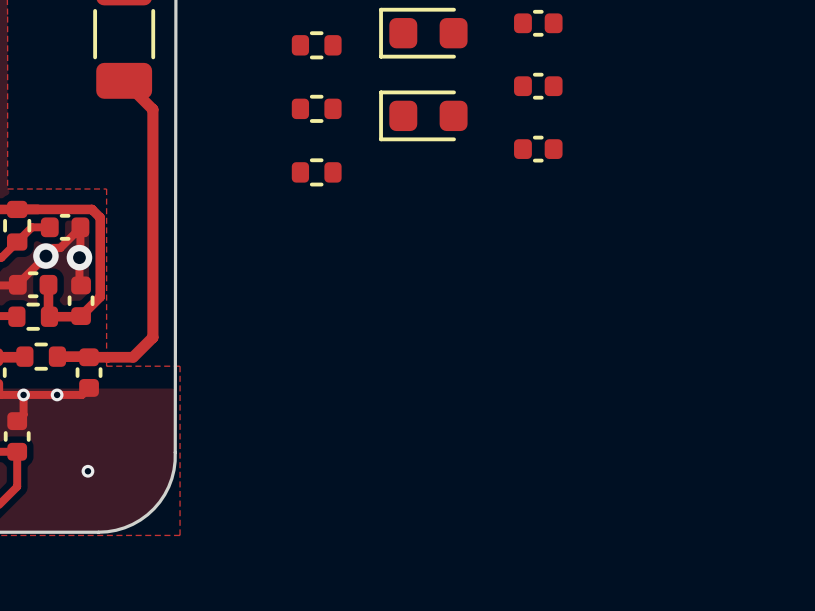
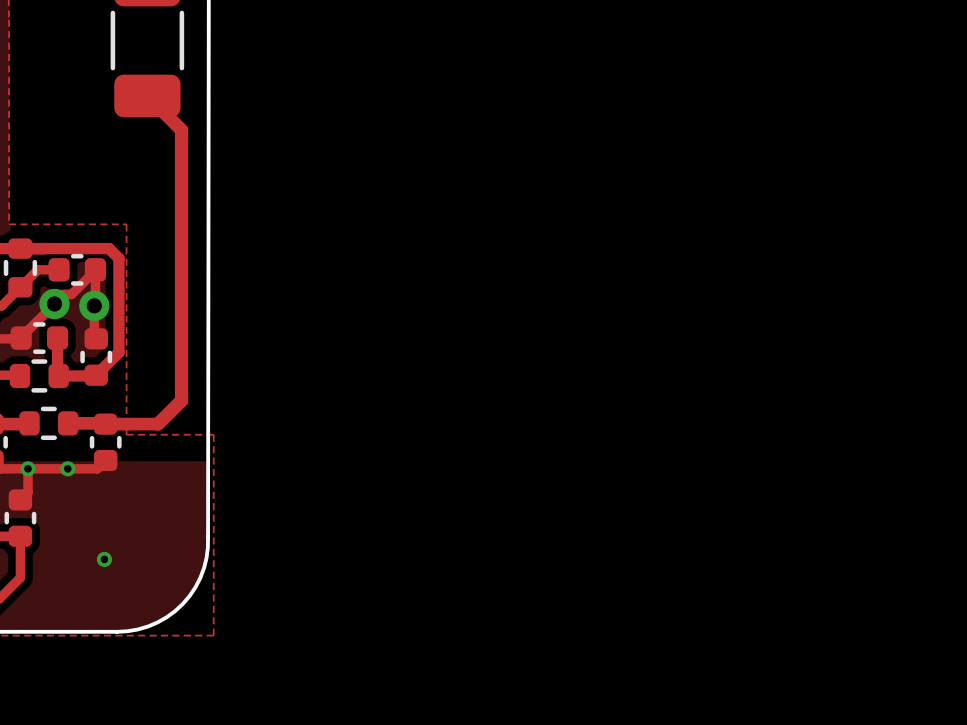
part: (538, 23) -> none
part: (423, 33) -> none
part: (316, 45) -> none
part: (538, 86) -> none
part: (316, 108) -> none
part: (423, 115) -> none
part: (538, 149) -> none
part: (316, 172) -> none

